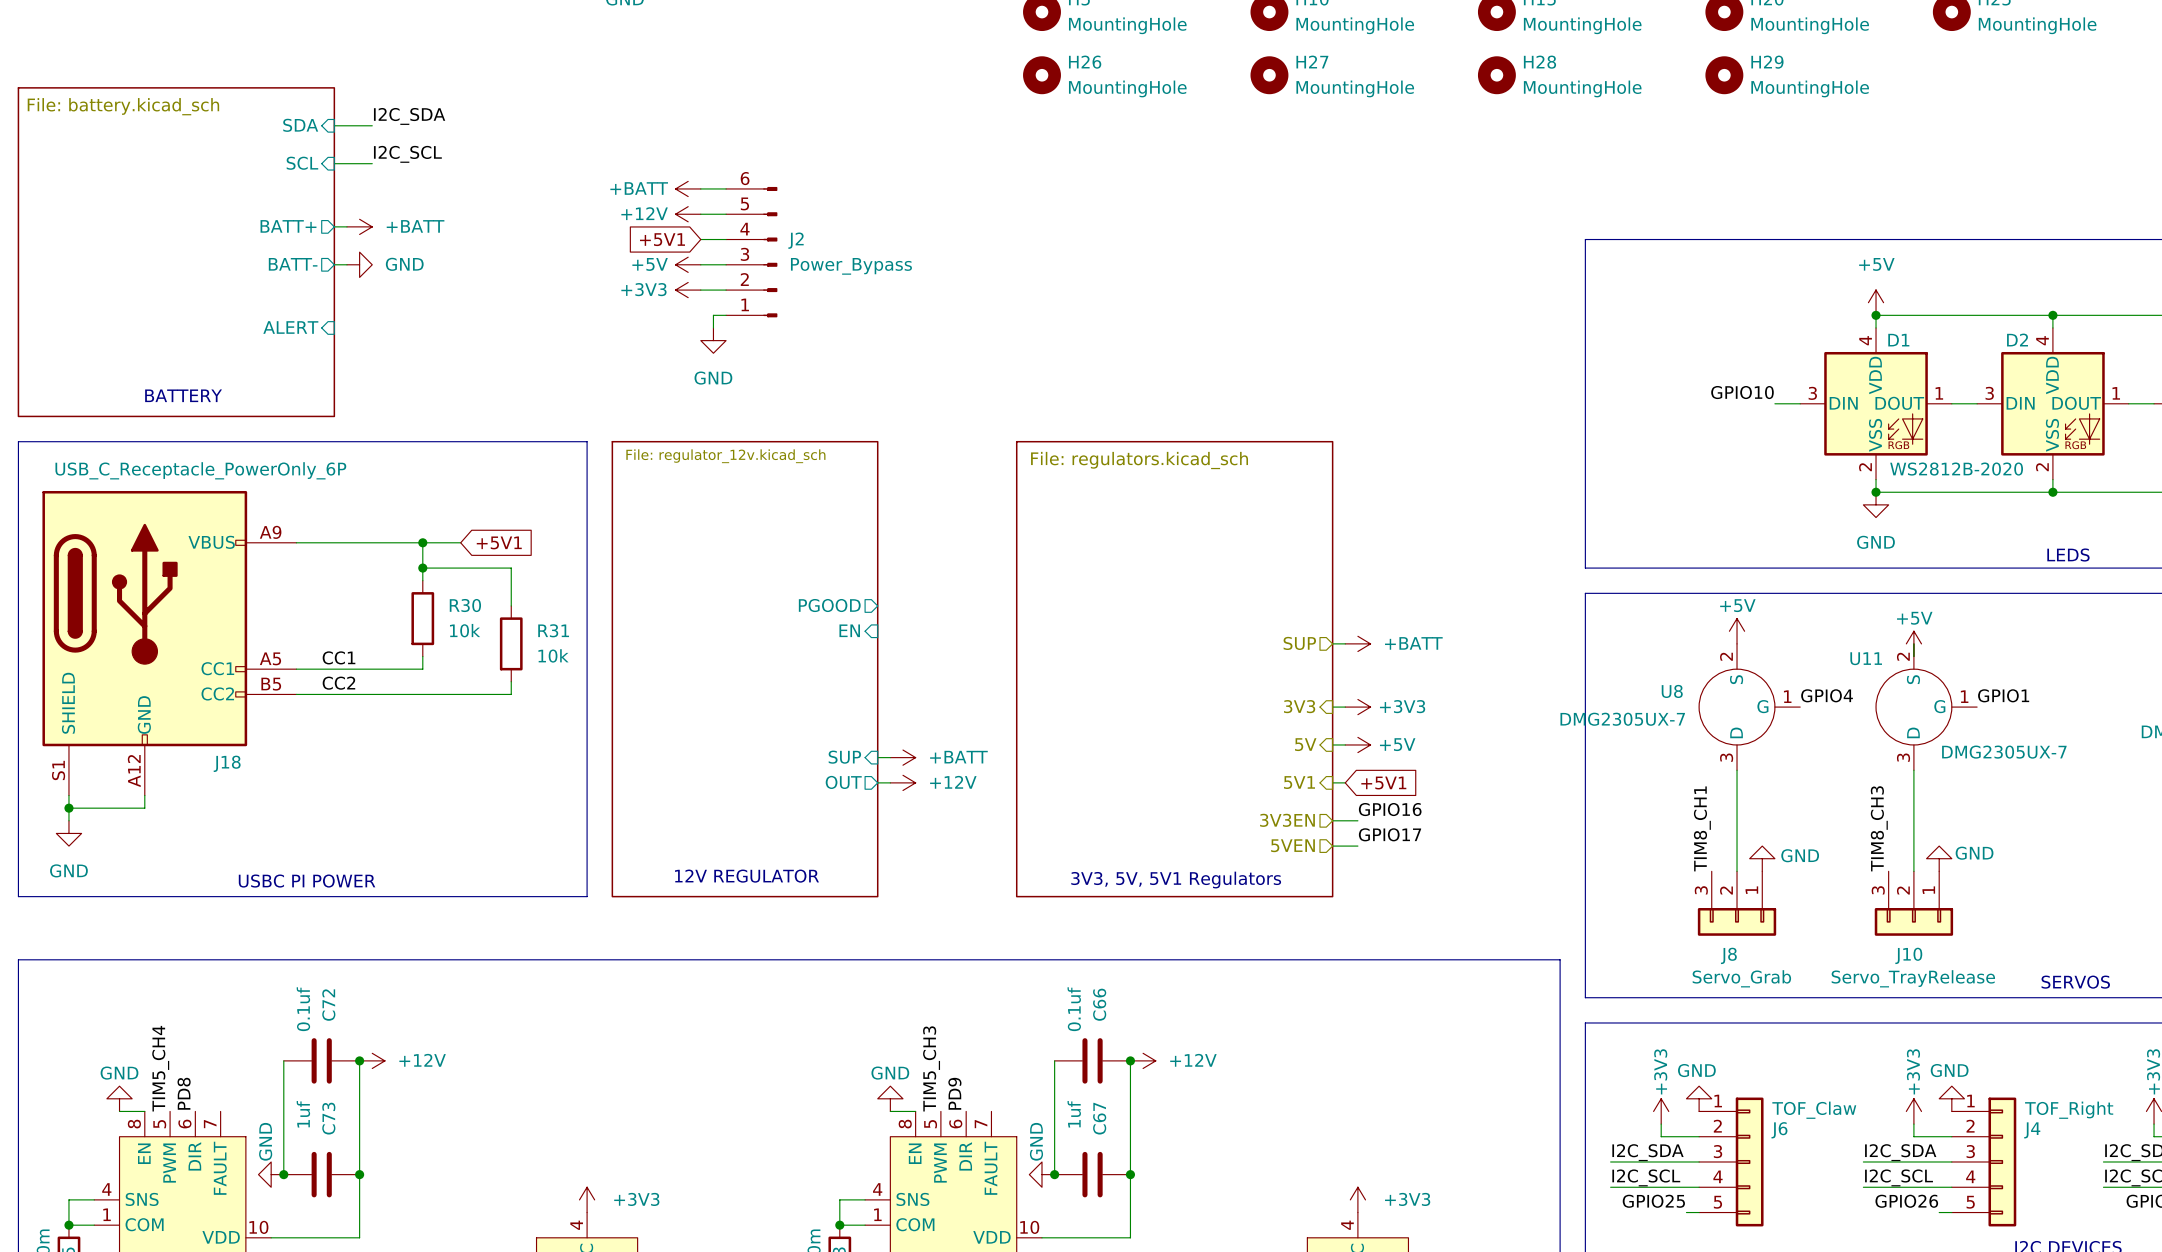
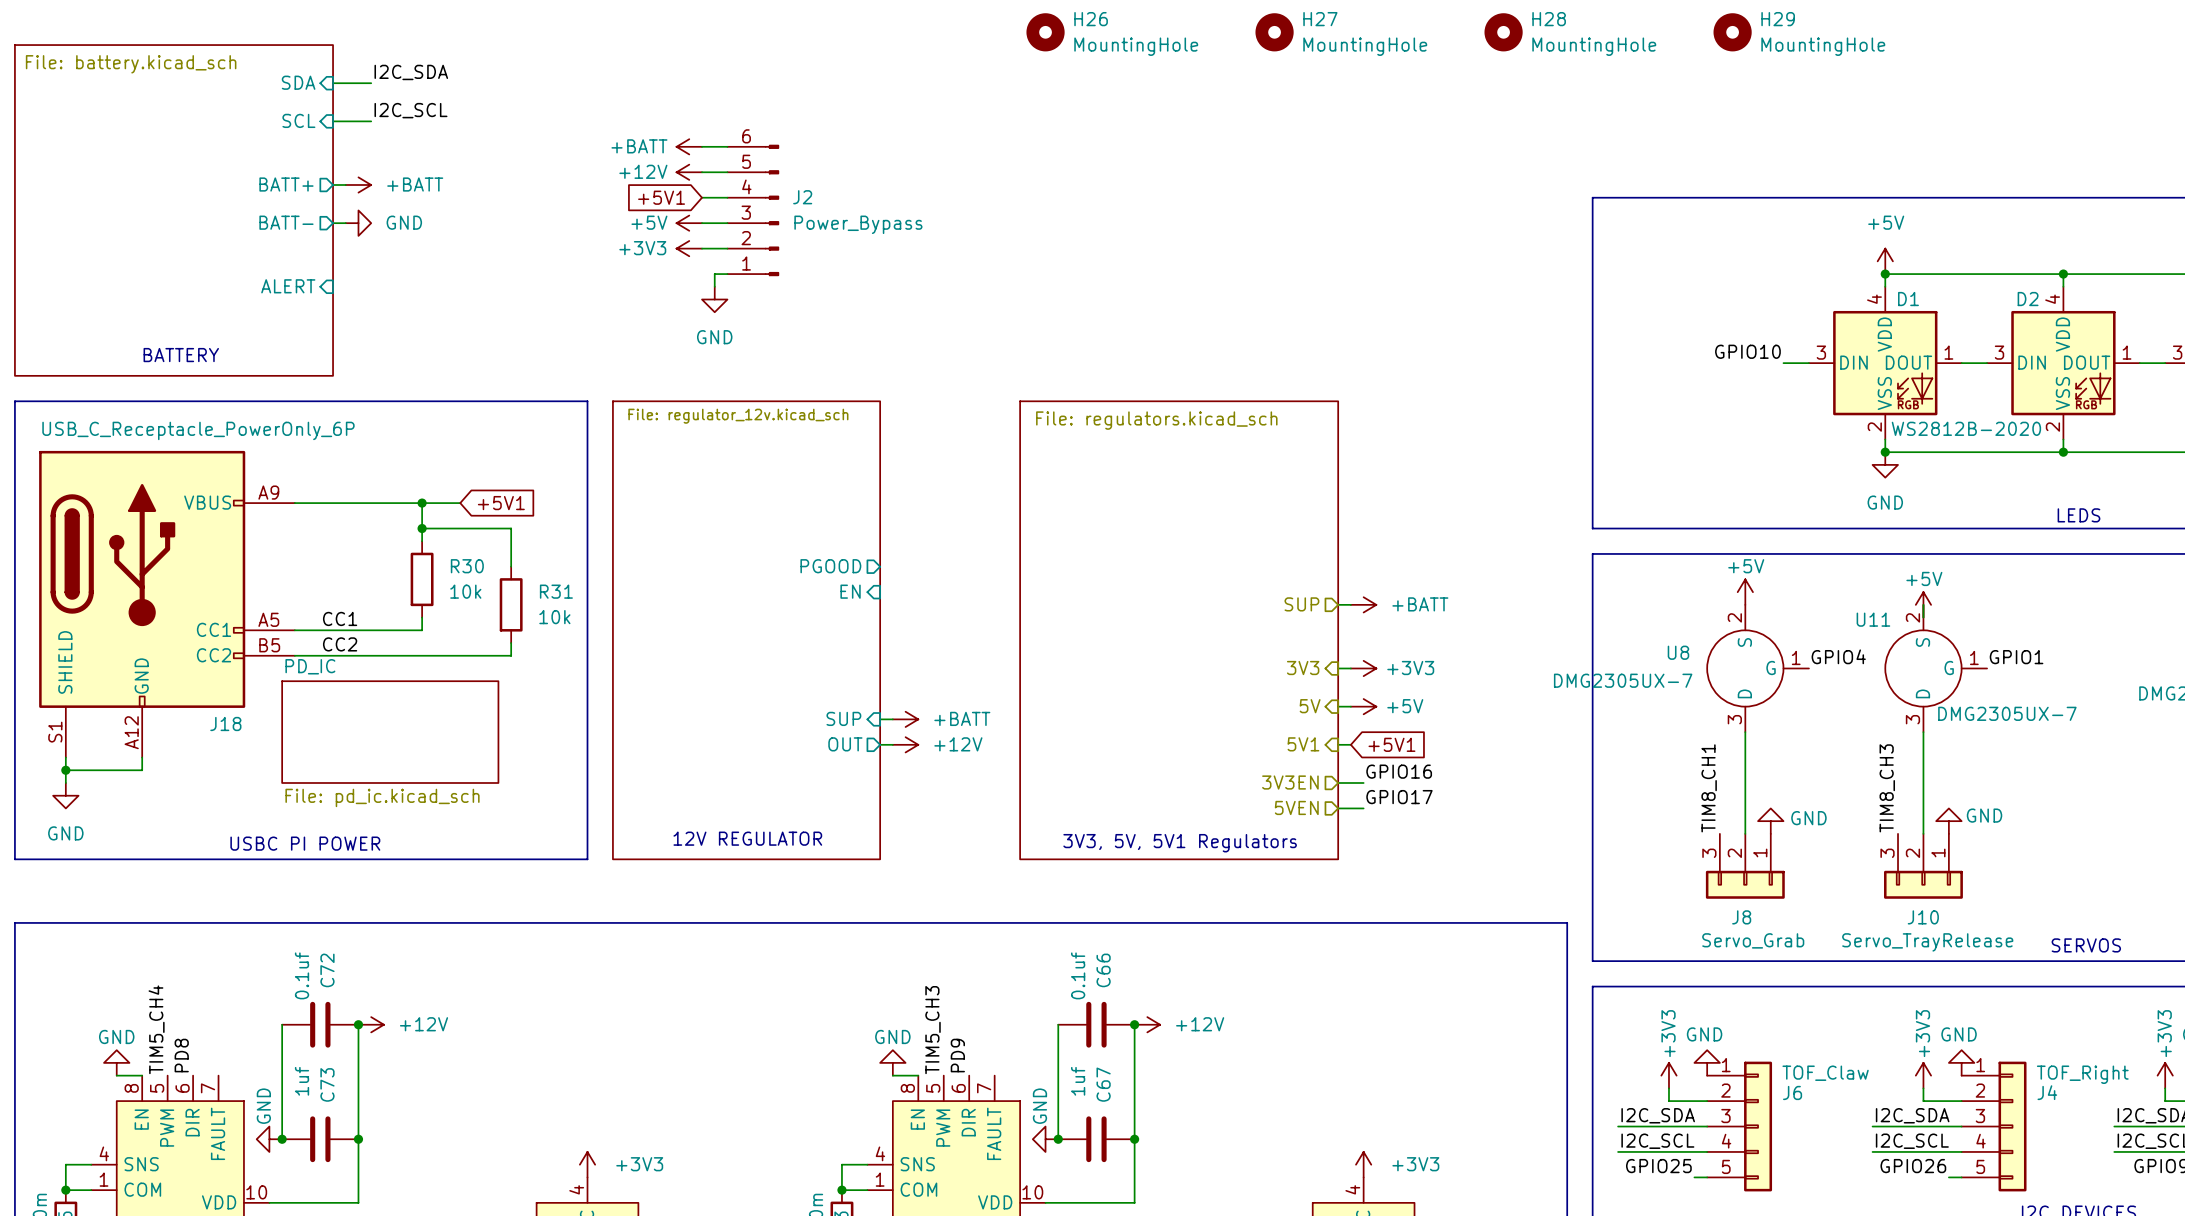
sheet PD_IC: none -> File: pd_ic.kicad_sch (390, 732)

